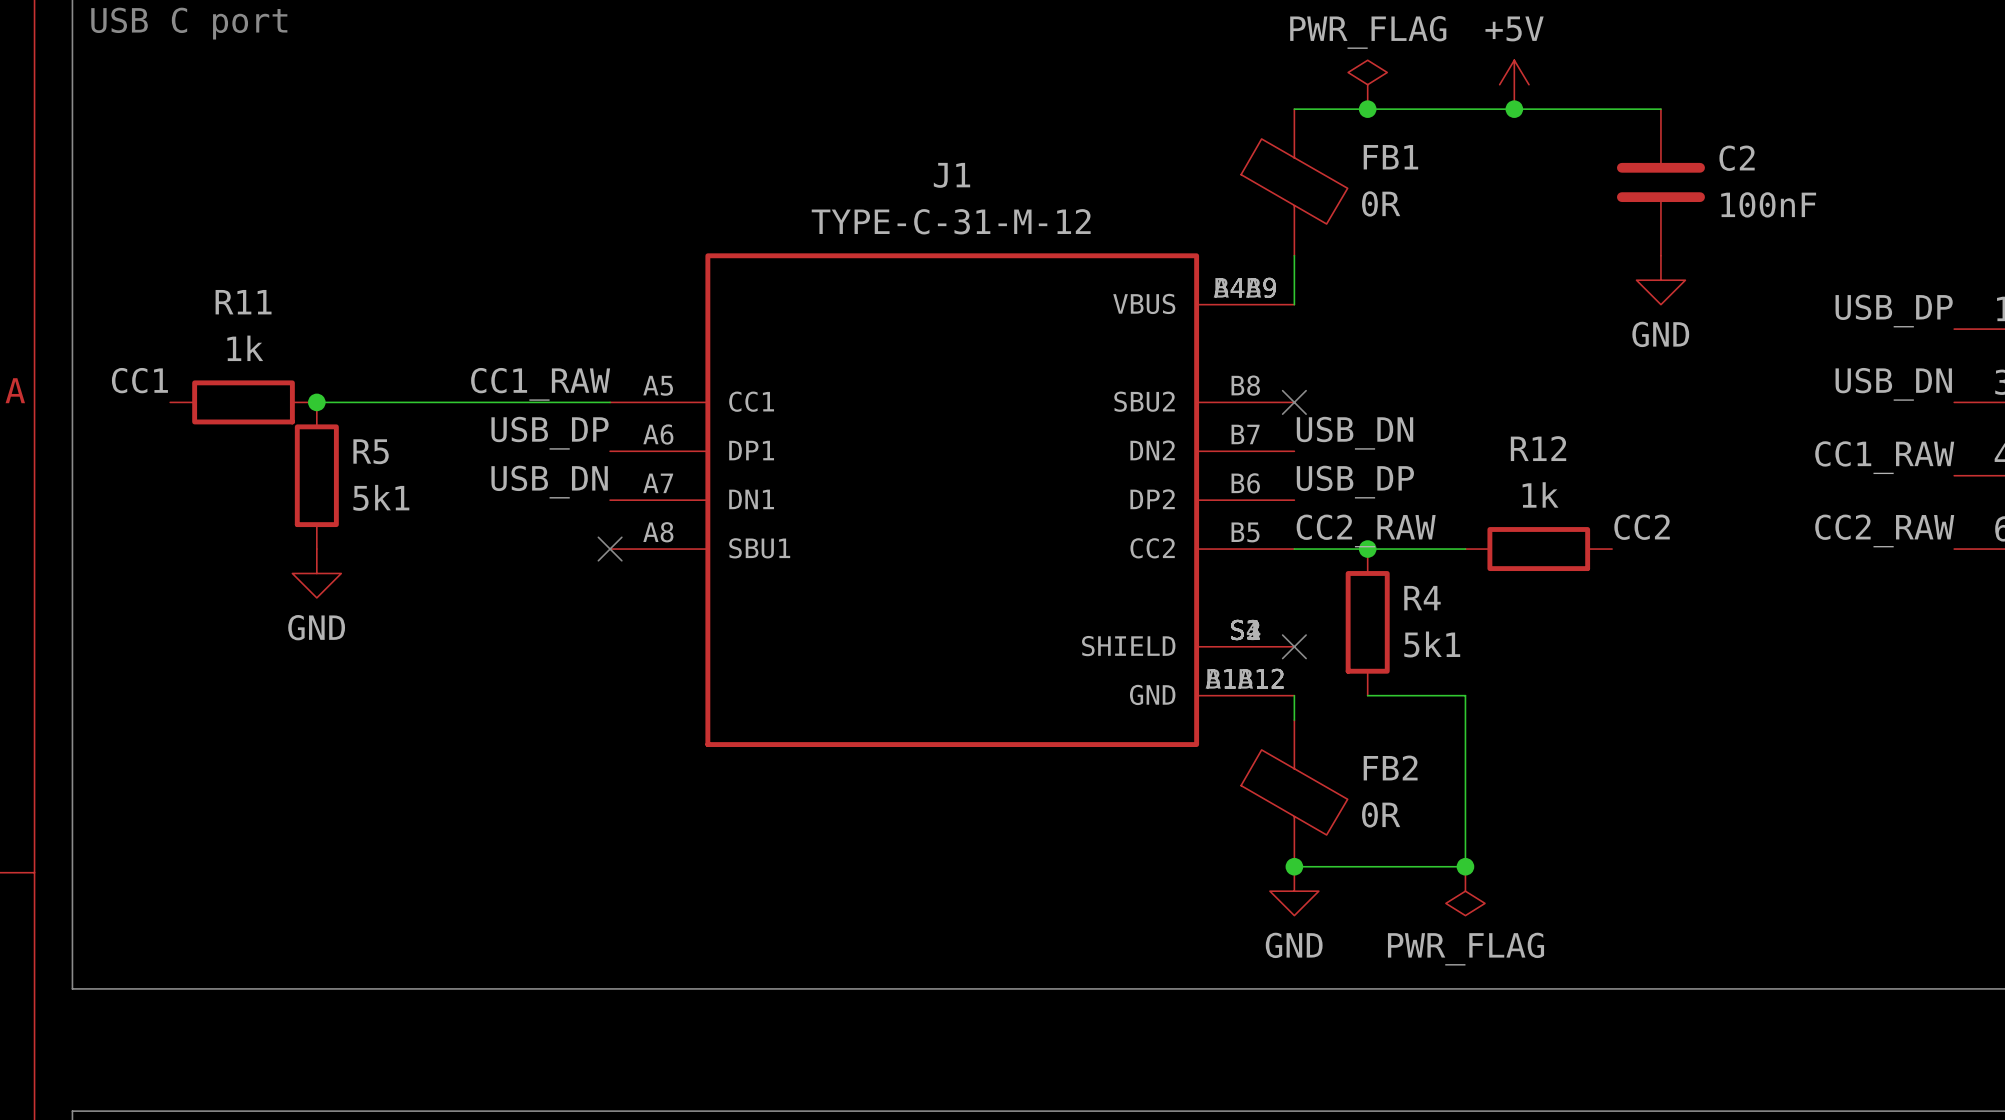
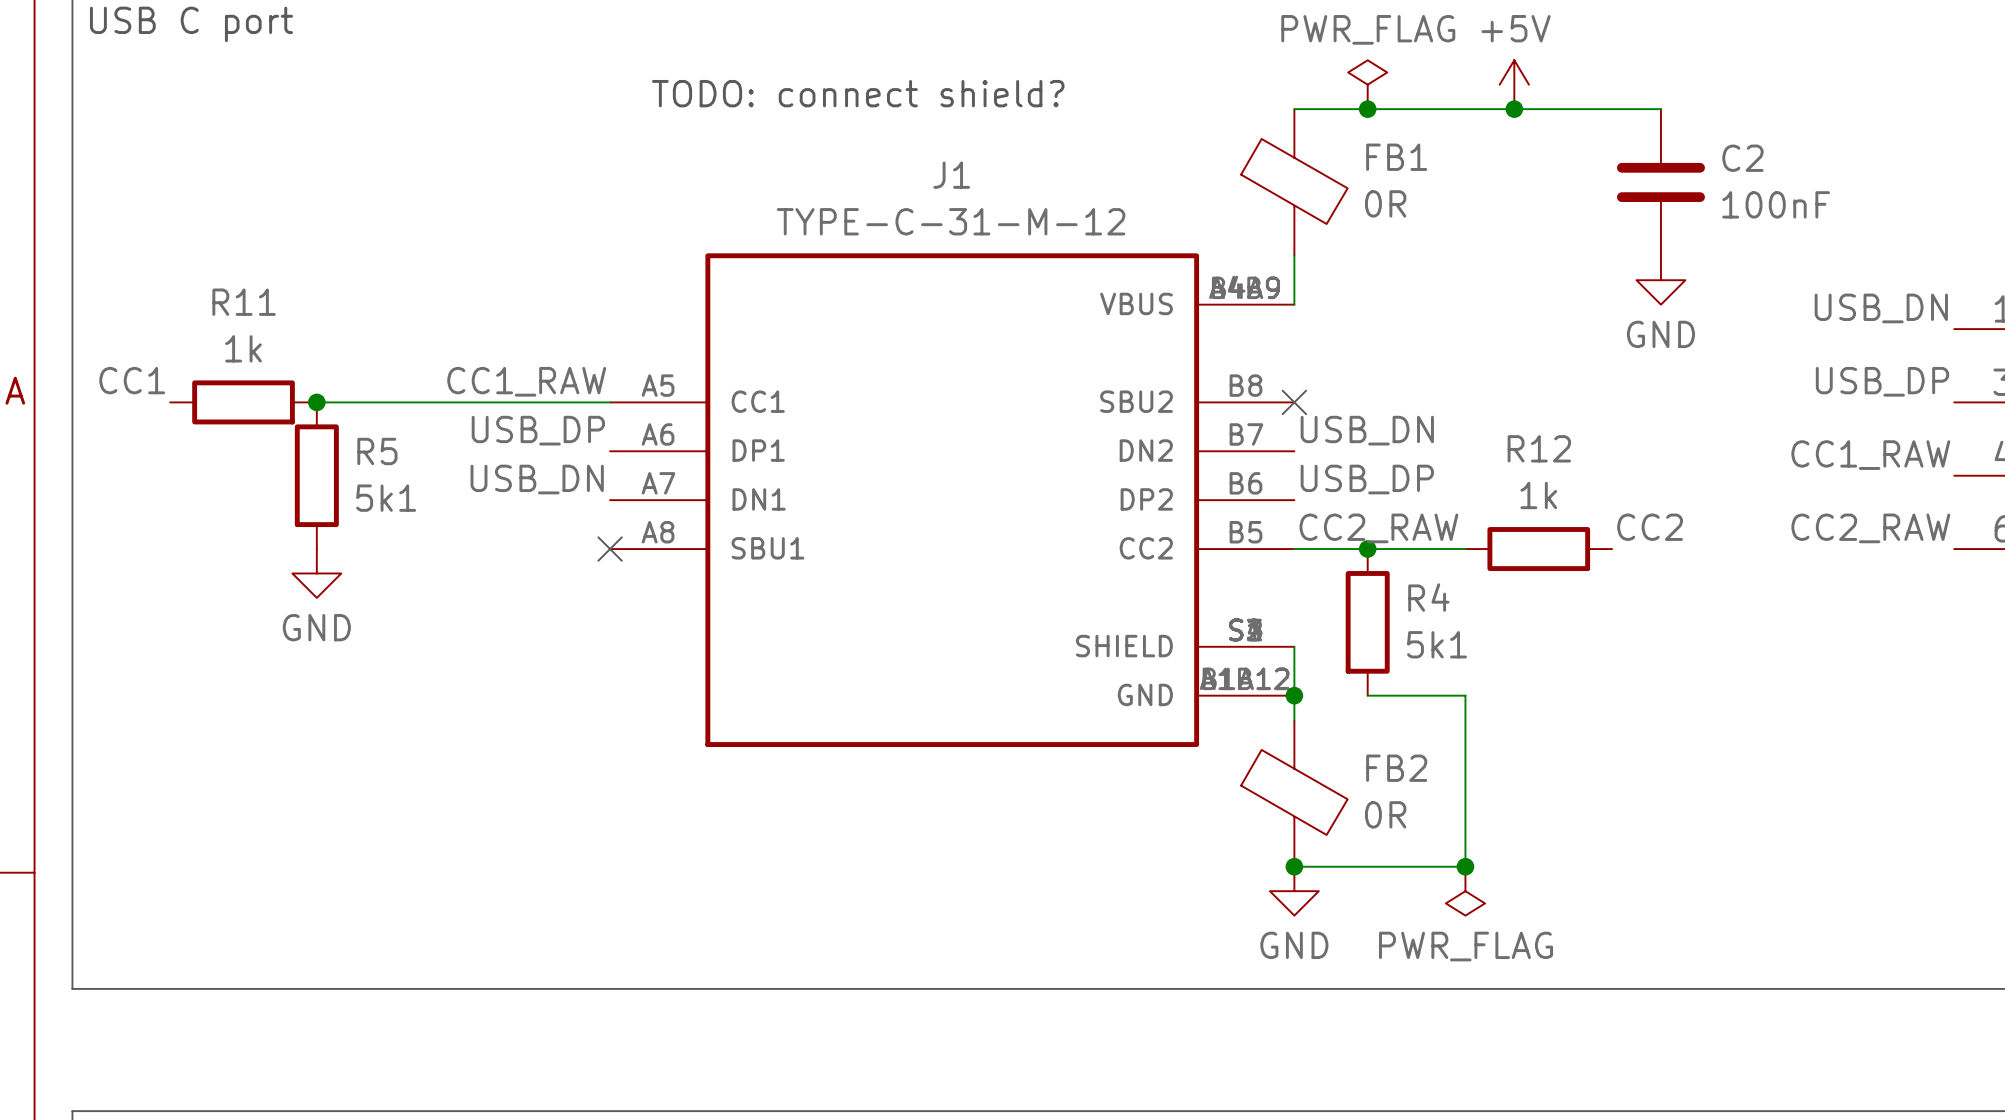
text: none -> TODO: connect shield? (858, 93)
label: USB_DP (1894, 311) -> USB_DN (1881, 308)
label: USB_DN (1893, 384) -> USB_DP (1882, 381)
wire: none -> (1294, 646) (1294, 695)
no-connect mark: (1294, 646) -> none
junction: none -> (1294, 695)

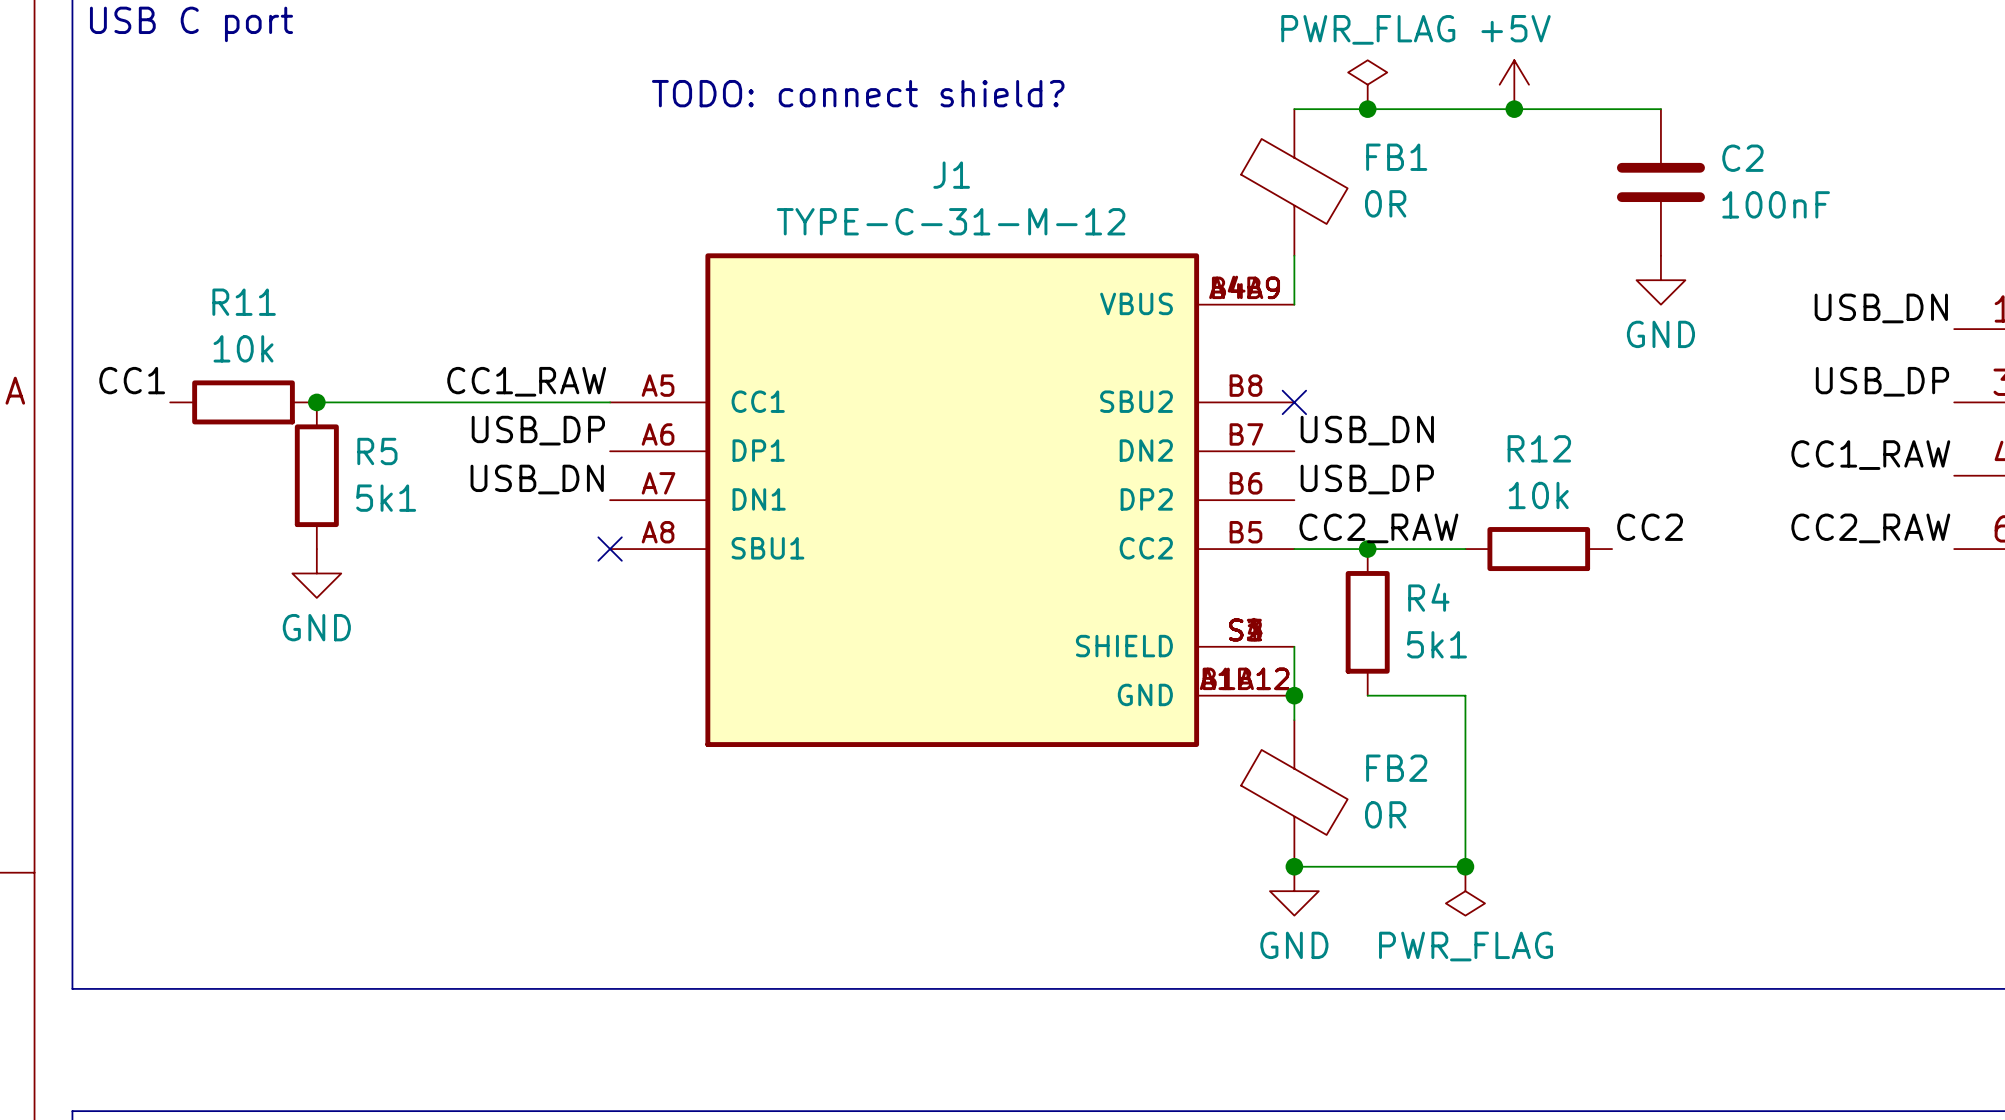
R11 value: 1k (243, 348) -> 10k (243, 348)
R12 value: 1k (1538, 495) -> 10k (1538, 495)

